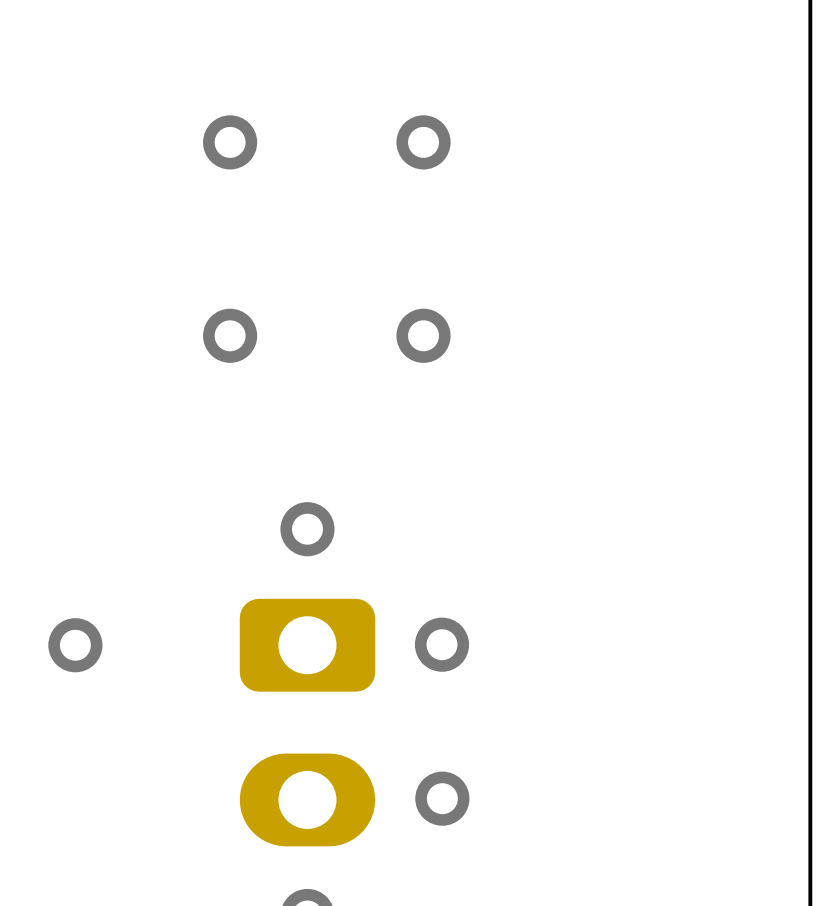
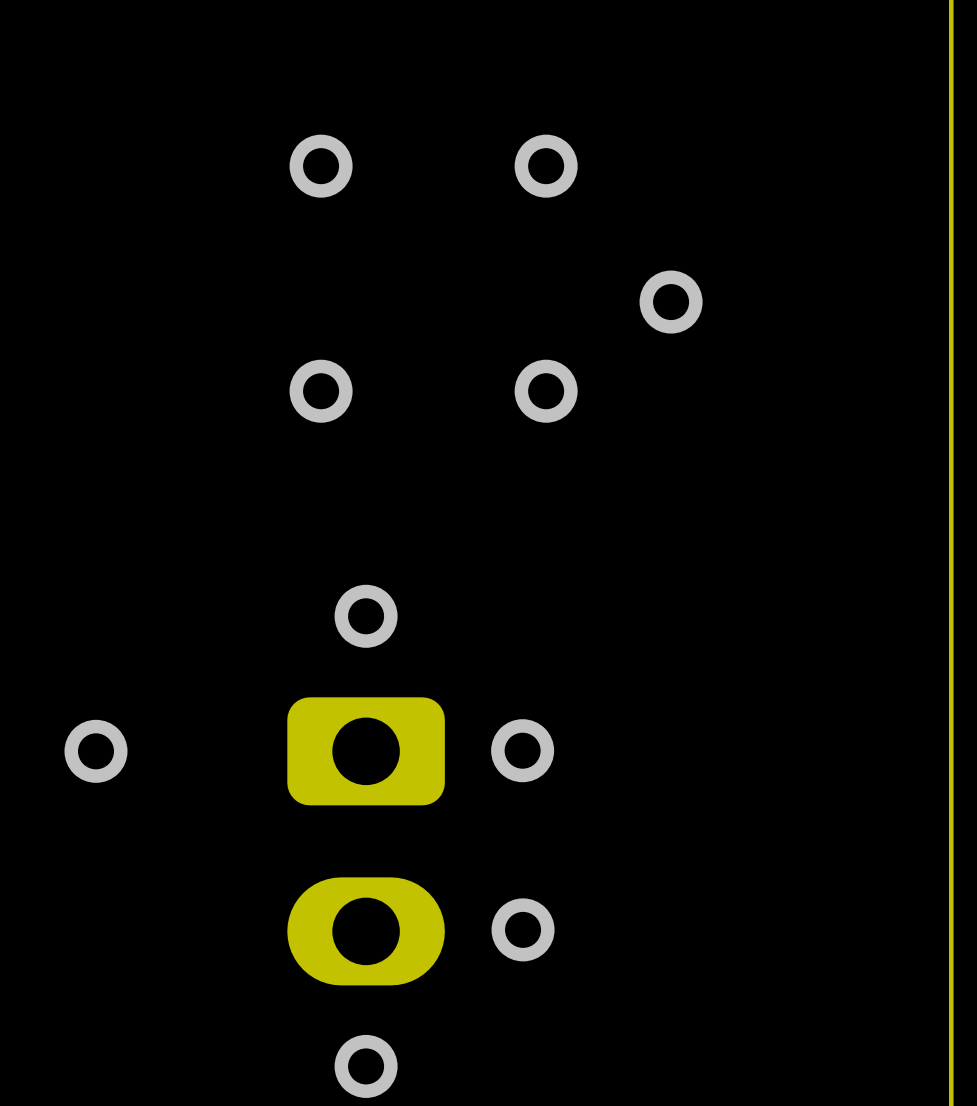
via position: (230, 142) -> (321, 166)
via position: (423, 142) -> (546, 166)
via: none -> (671, 302)
via position: (230, 335) -> (321, 391)
via position: (423, 335) -> (546, 391)

